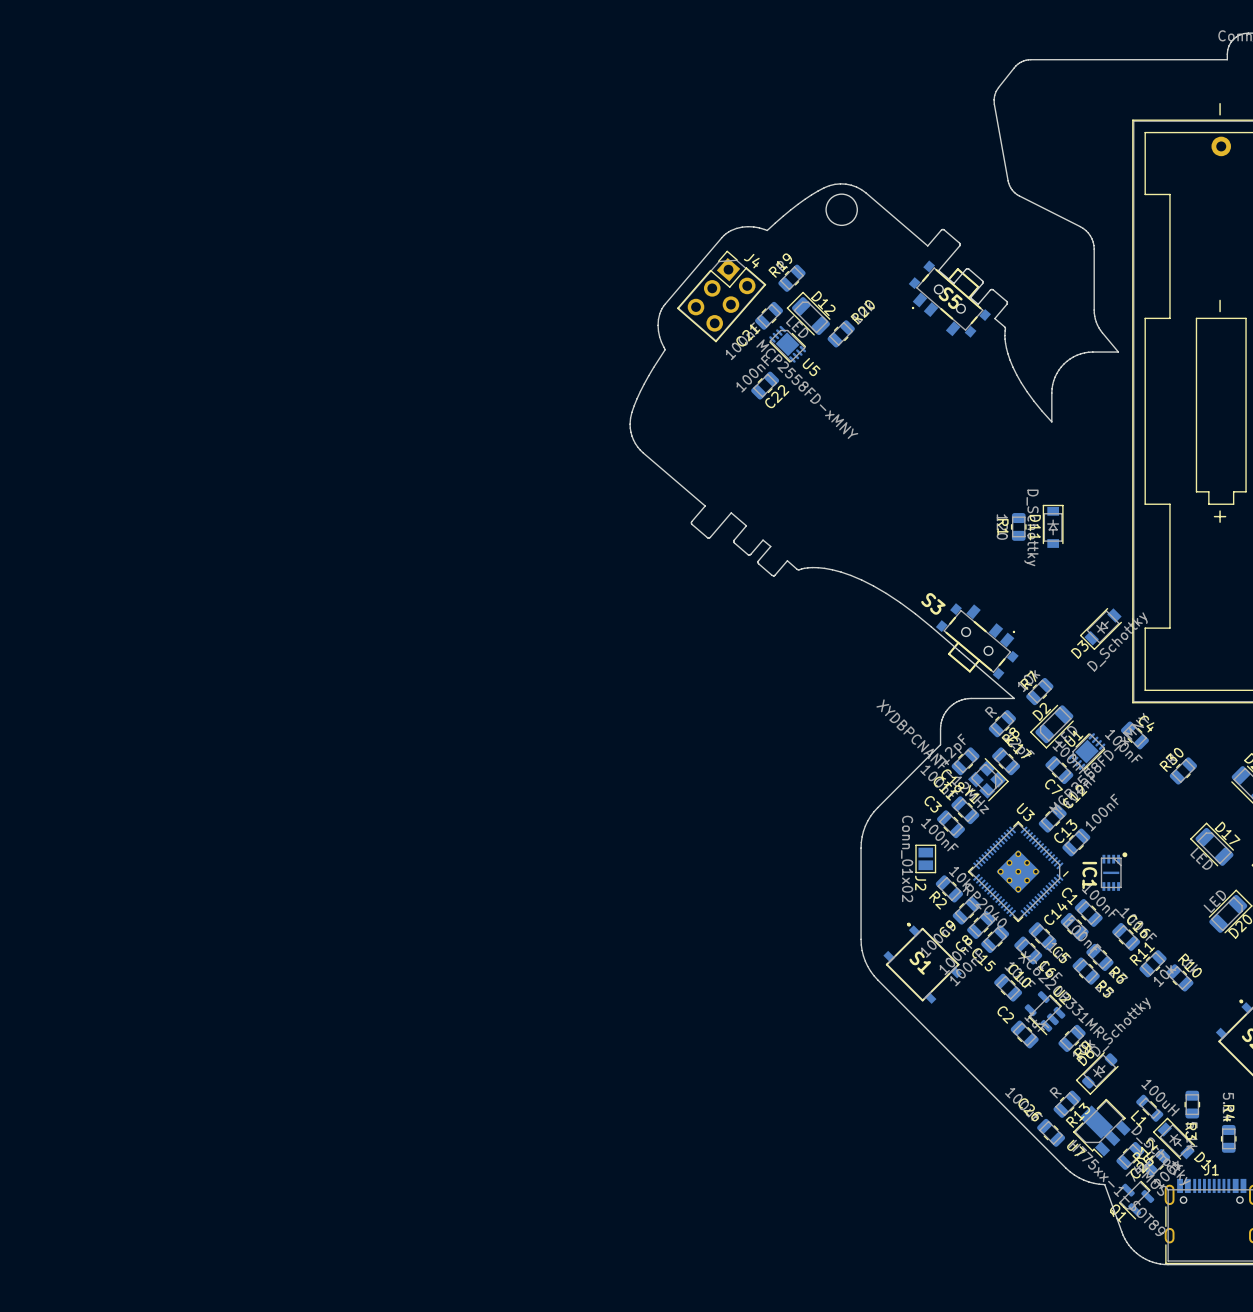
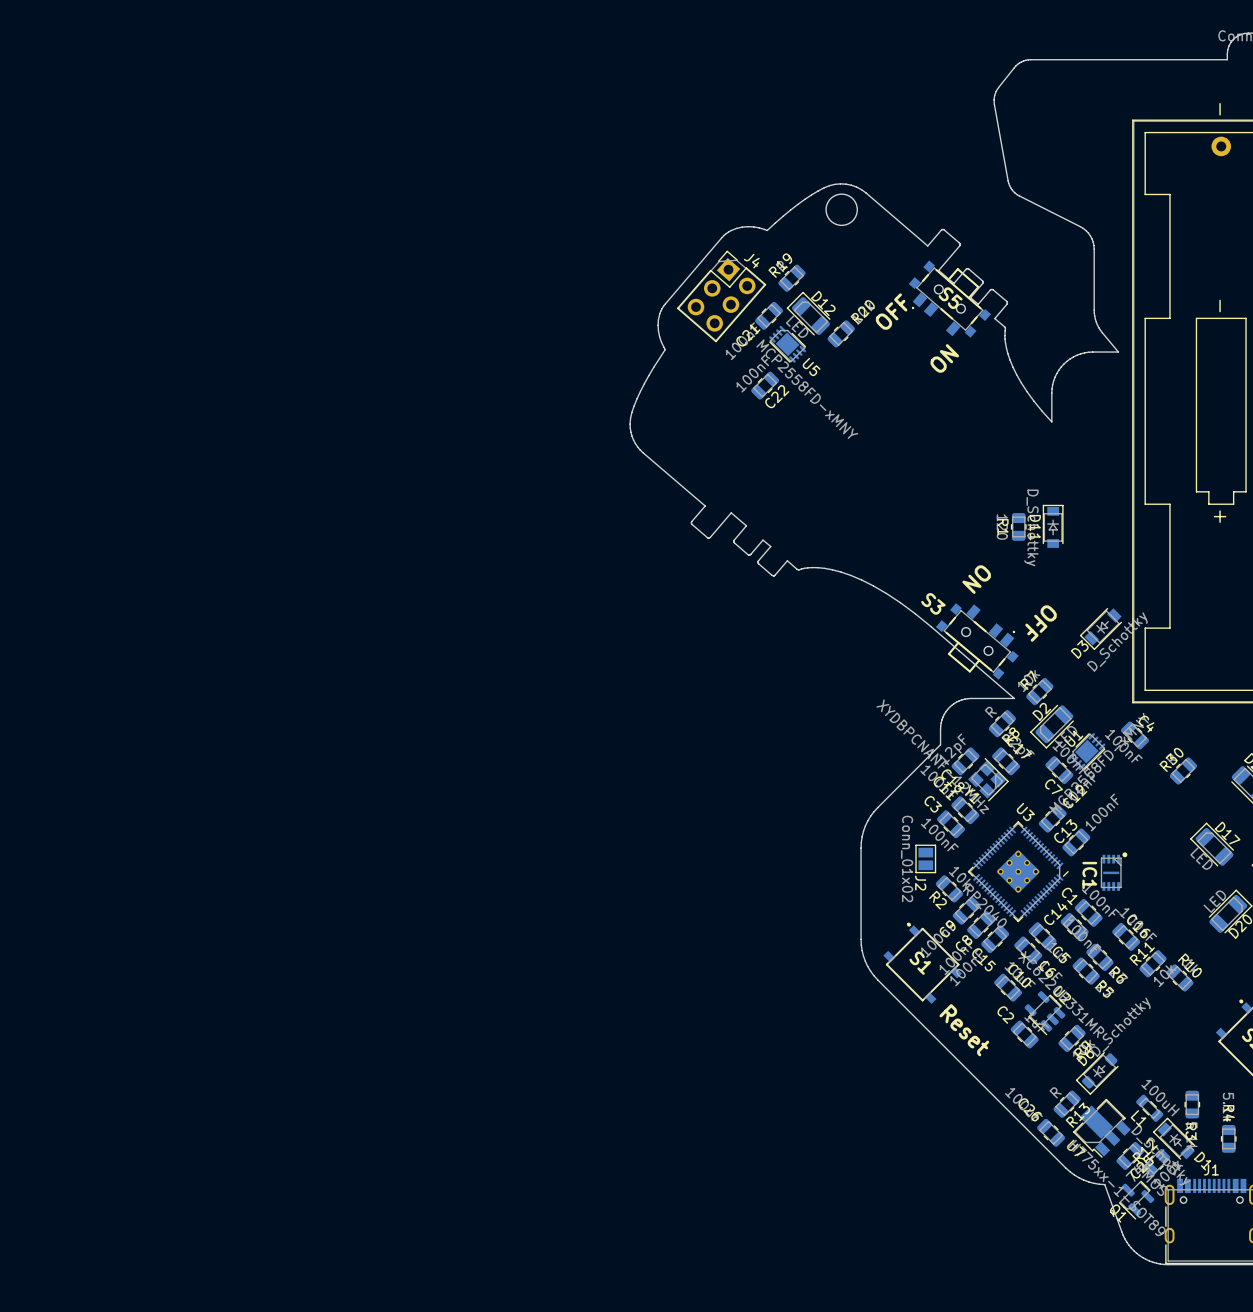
text: none -> OFF (891, 311)
text: none -> ON (944, 358)
text: none -> ON (976, 579)
text: none -> OFF (1041, 623)
text: none -> Reset (964, 1030)

